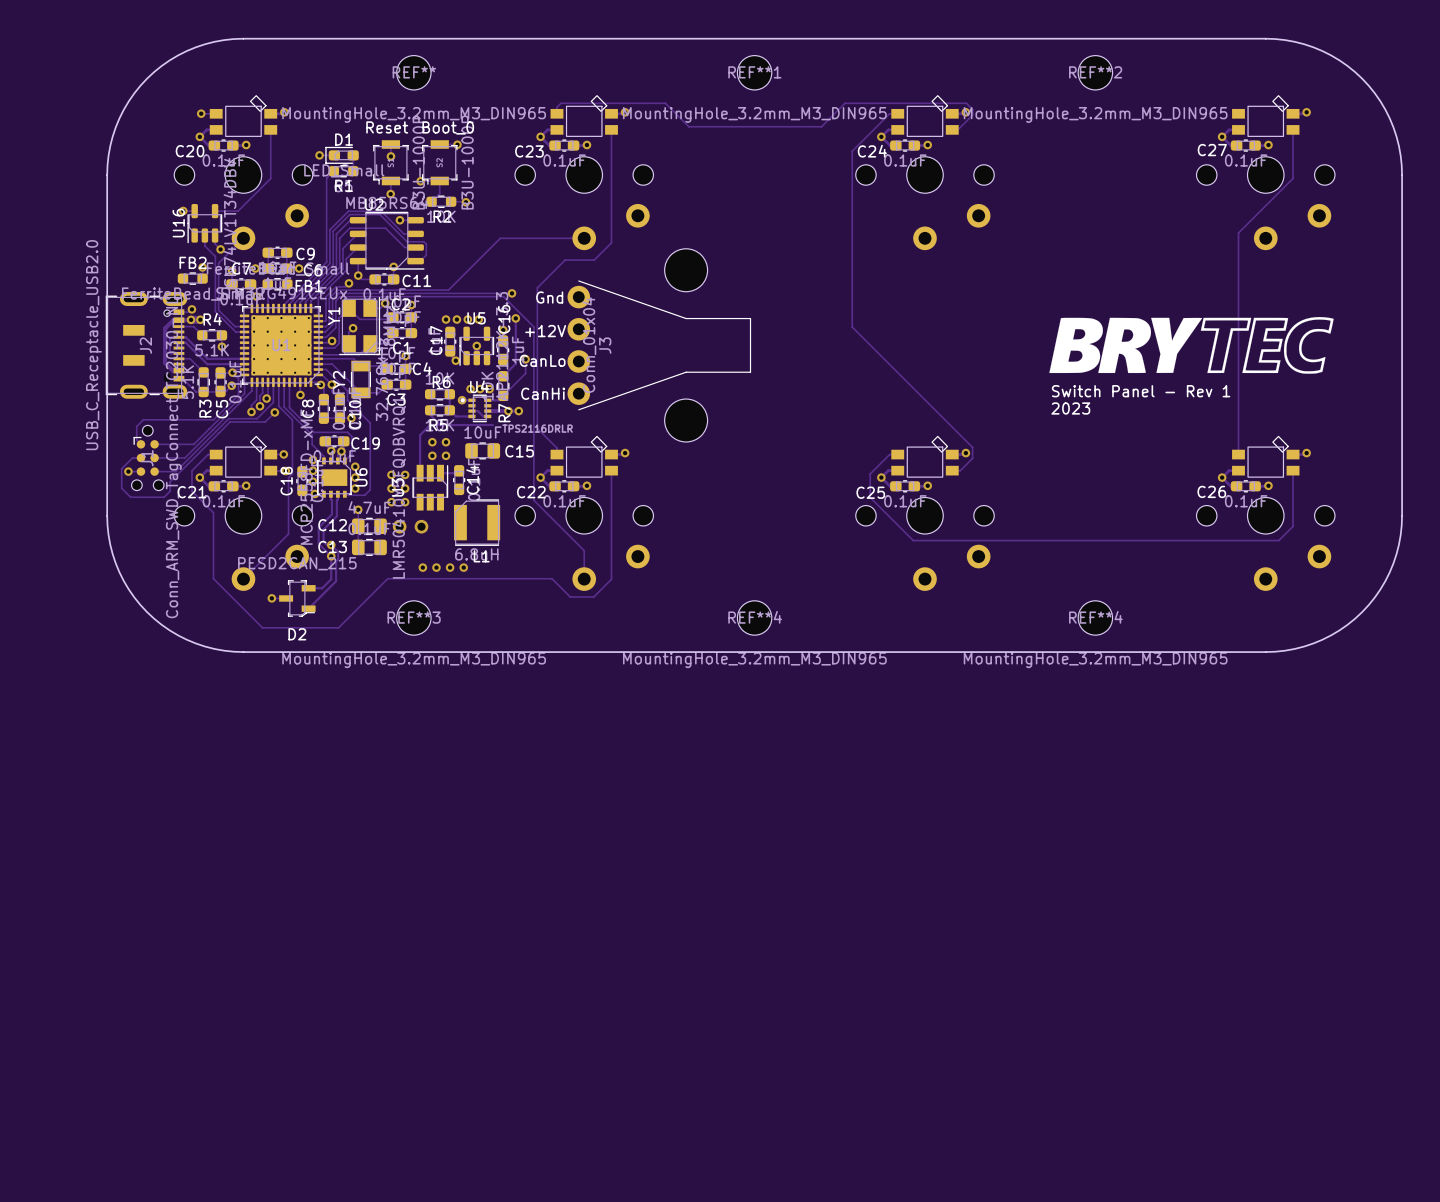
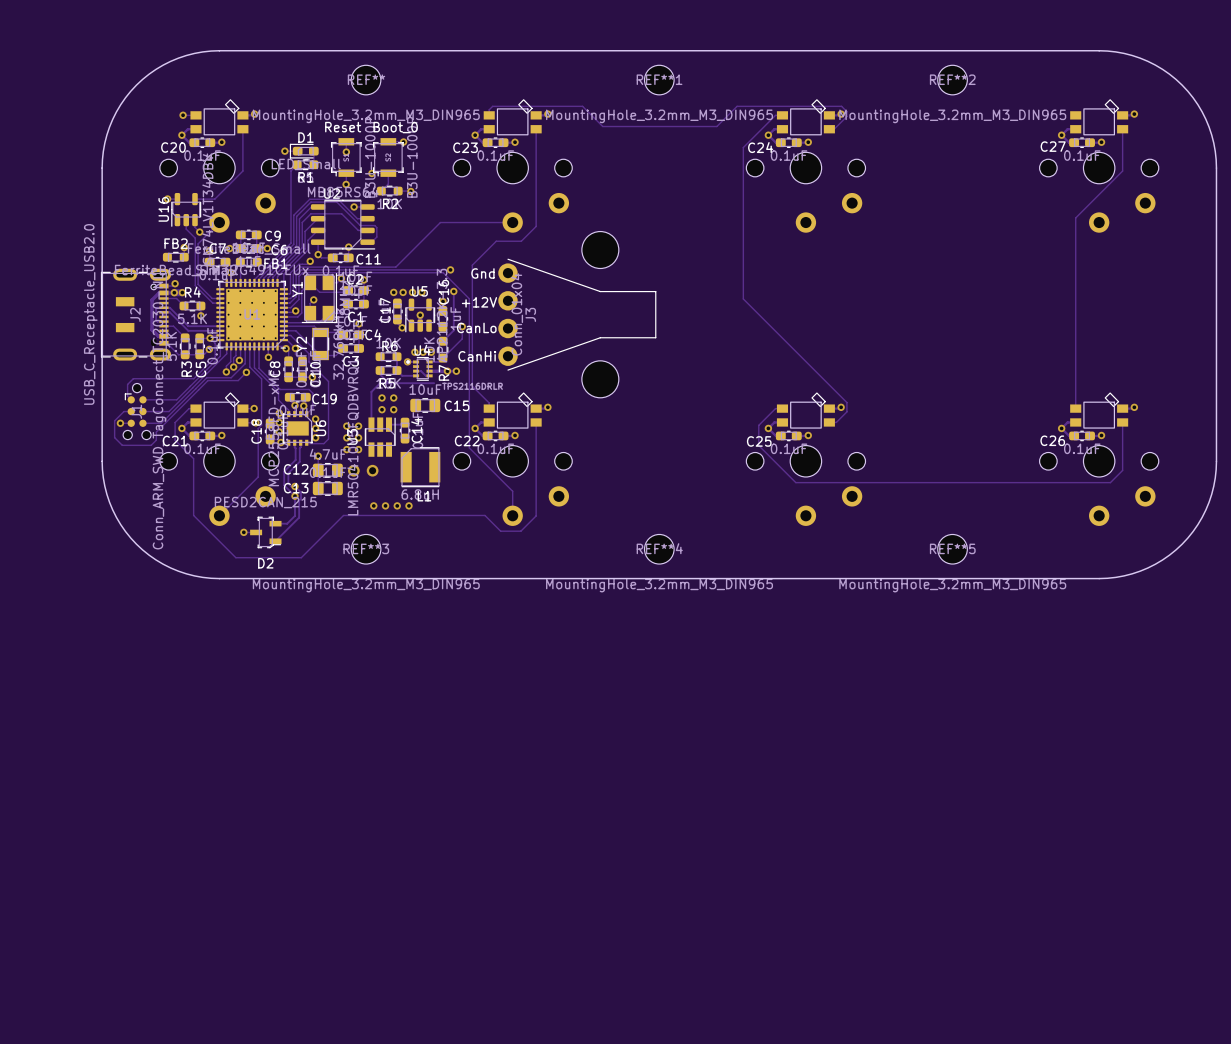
drawing: [1049, 317, 1334, 374] -> none
text: Switch Panel - Rev 1 (1141, 391) -> none
text: 2023 (1070, 408) -> none
REF**4 name: REF**4 (1095, 617) -> REF**5 (952, 548)

